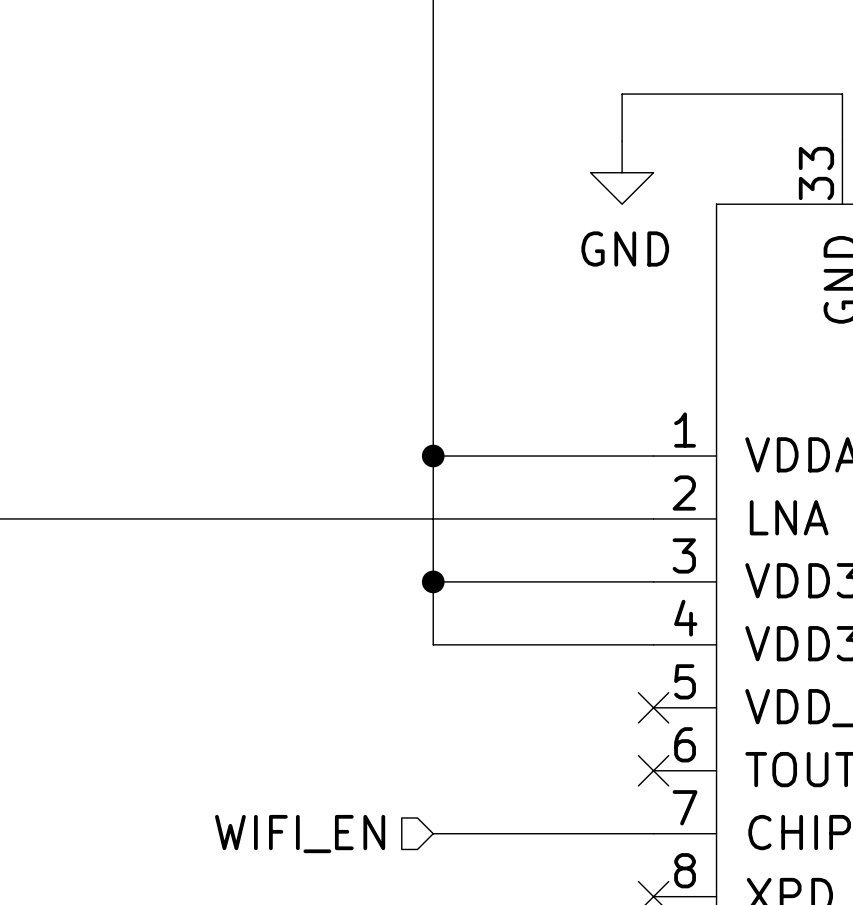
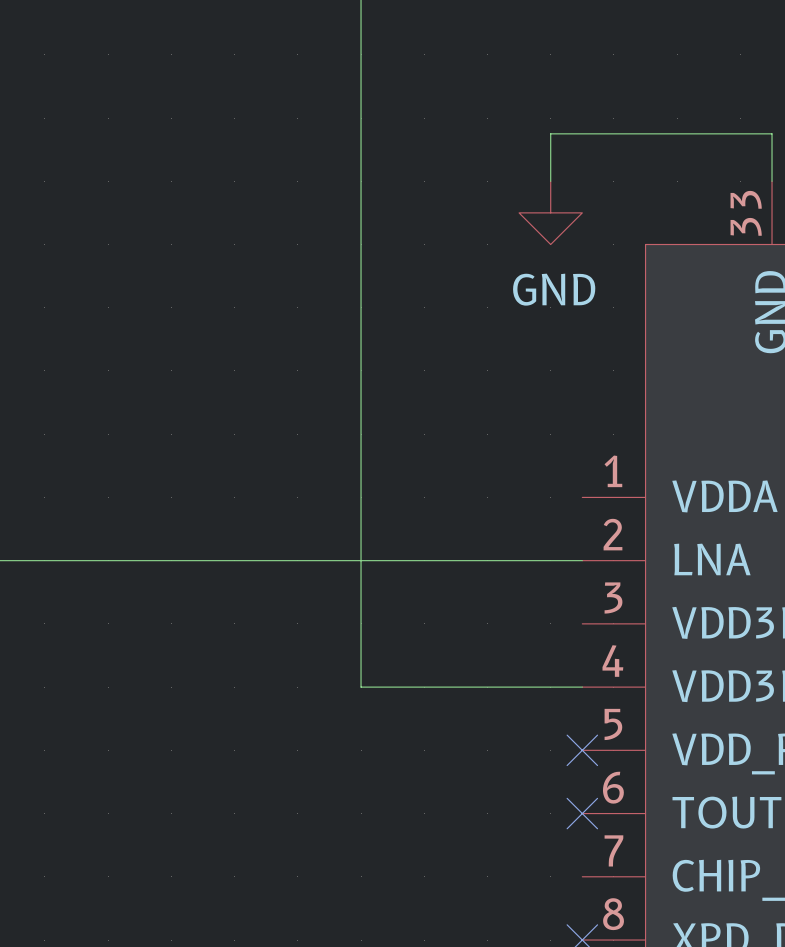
wire: (433, 456) (653, 456) -> none
junction: (433, 456) -> none
wire: (433, 581) (653, 581) -> none
junction: (433, 581) -> none
wire: (433, 833) (653, 833) -> none
hierarchical label: WIFI_EN (300, 834) -> none

